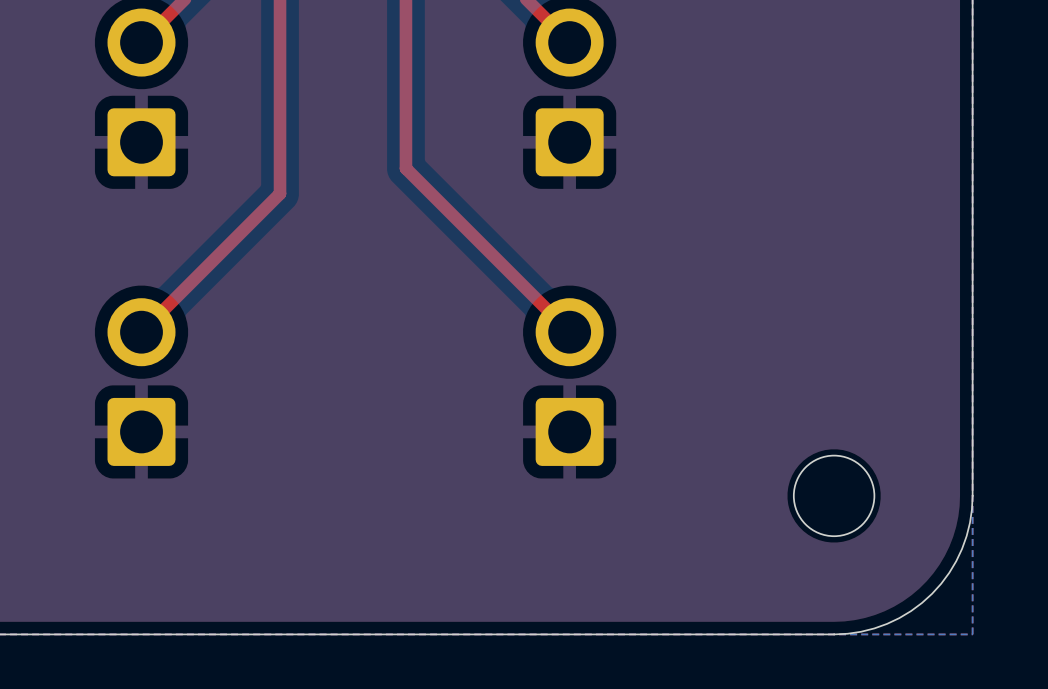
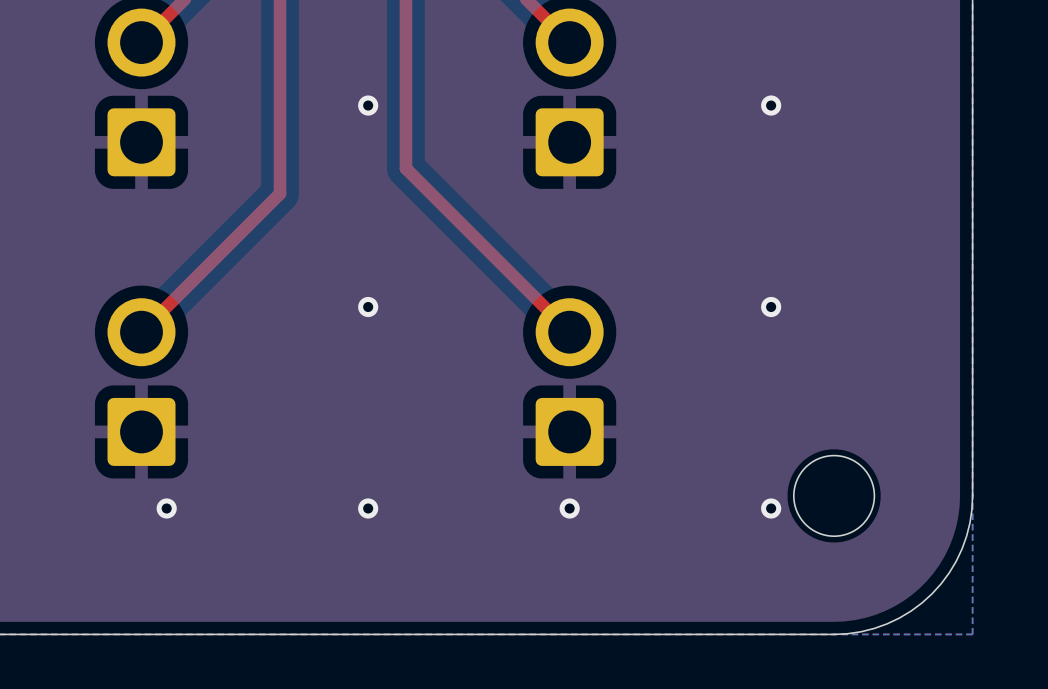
via: none -> (368, 105)
via: none -> (771, 105)
via: none -> (368, 307)
via: none -> (771, 307)
via: none -> (166, 508)
via: none -> (368, 508)
via: none -> (569, 508)
via: none -> (771, 508)

